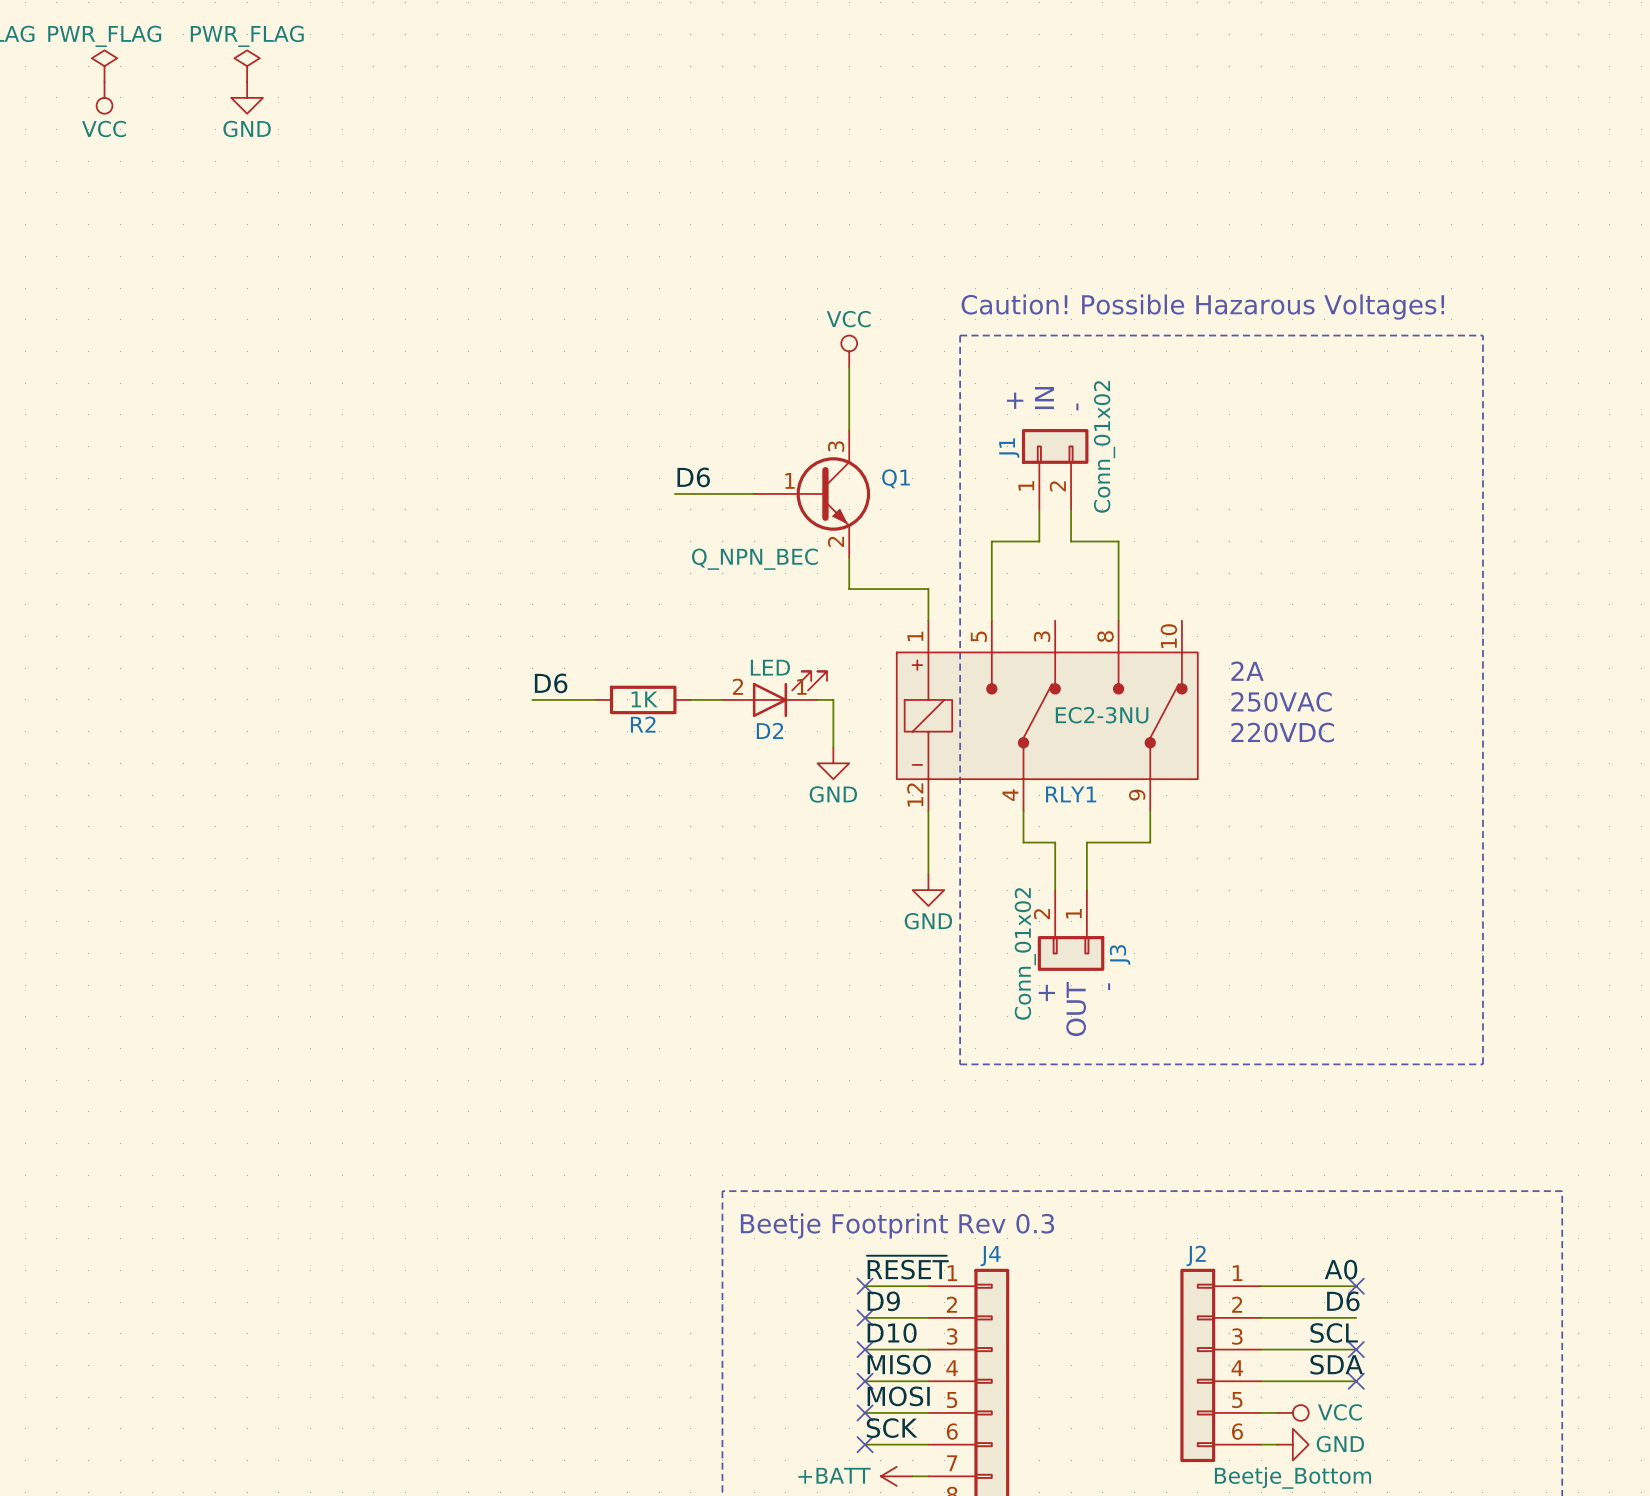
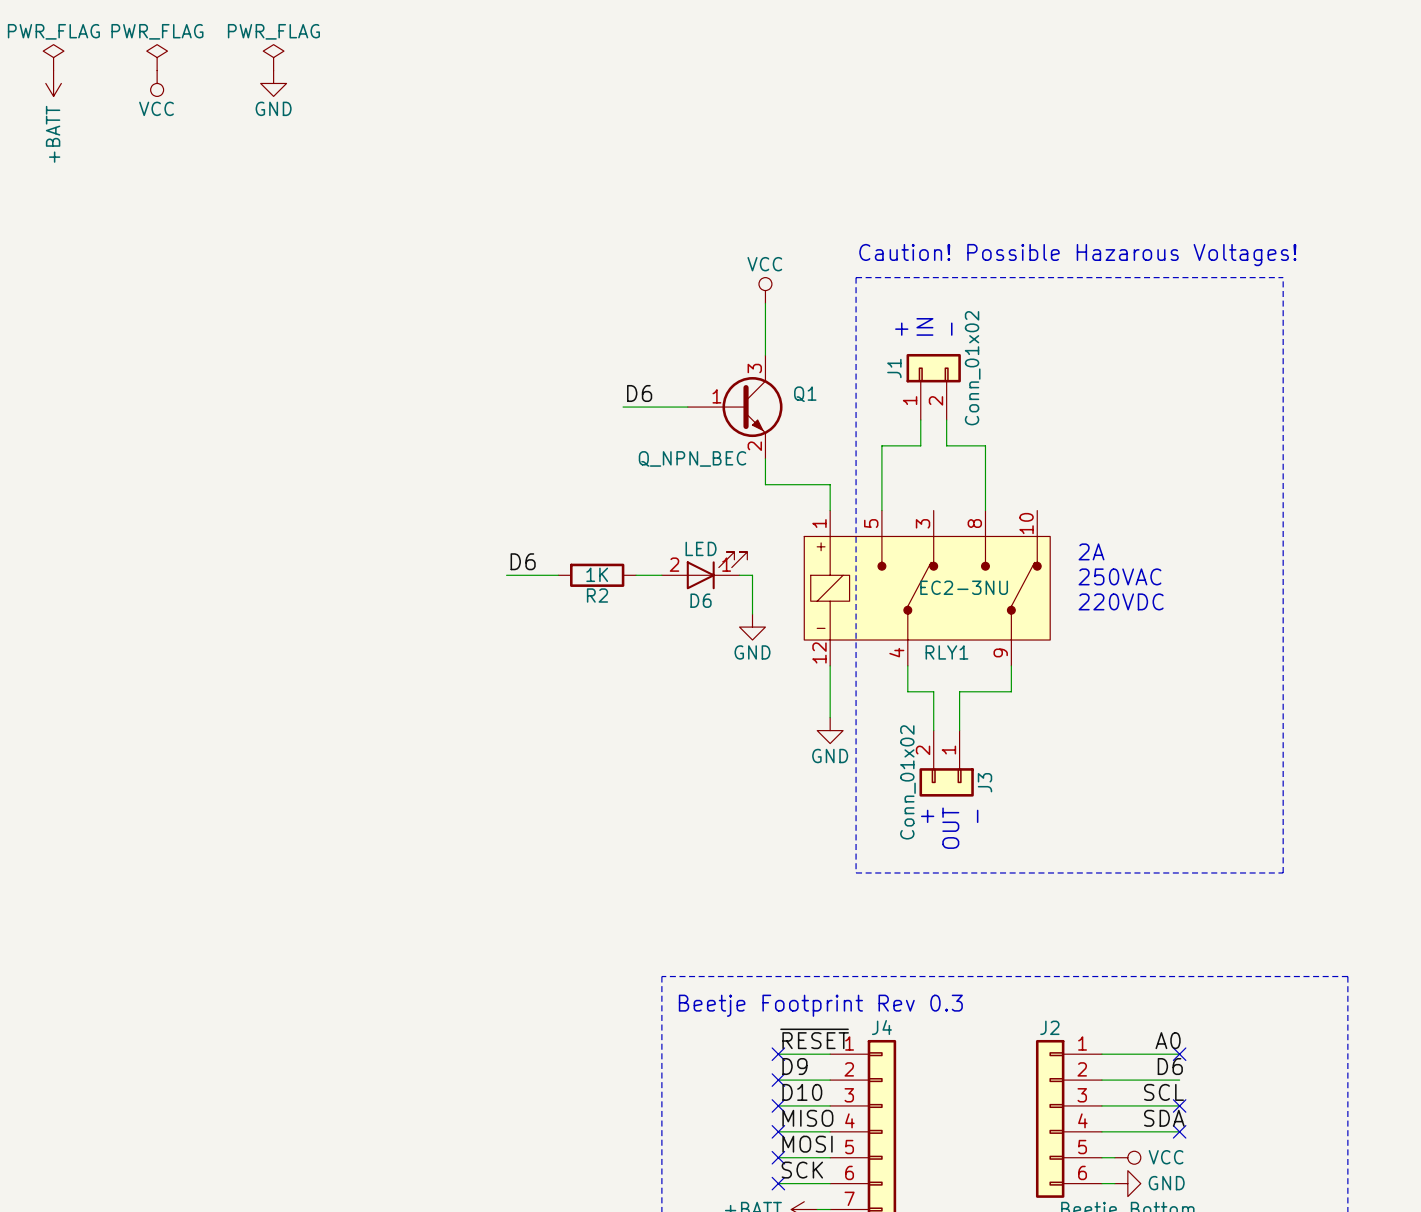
D2 name: D2 (769, 730) -> D6 (701, 600)

